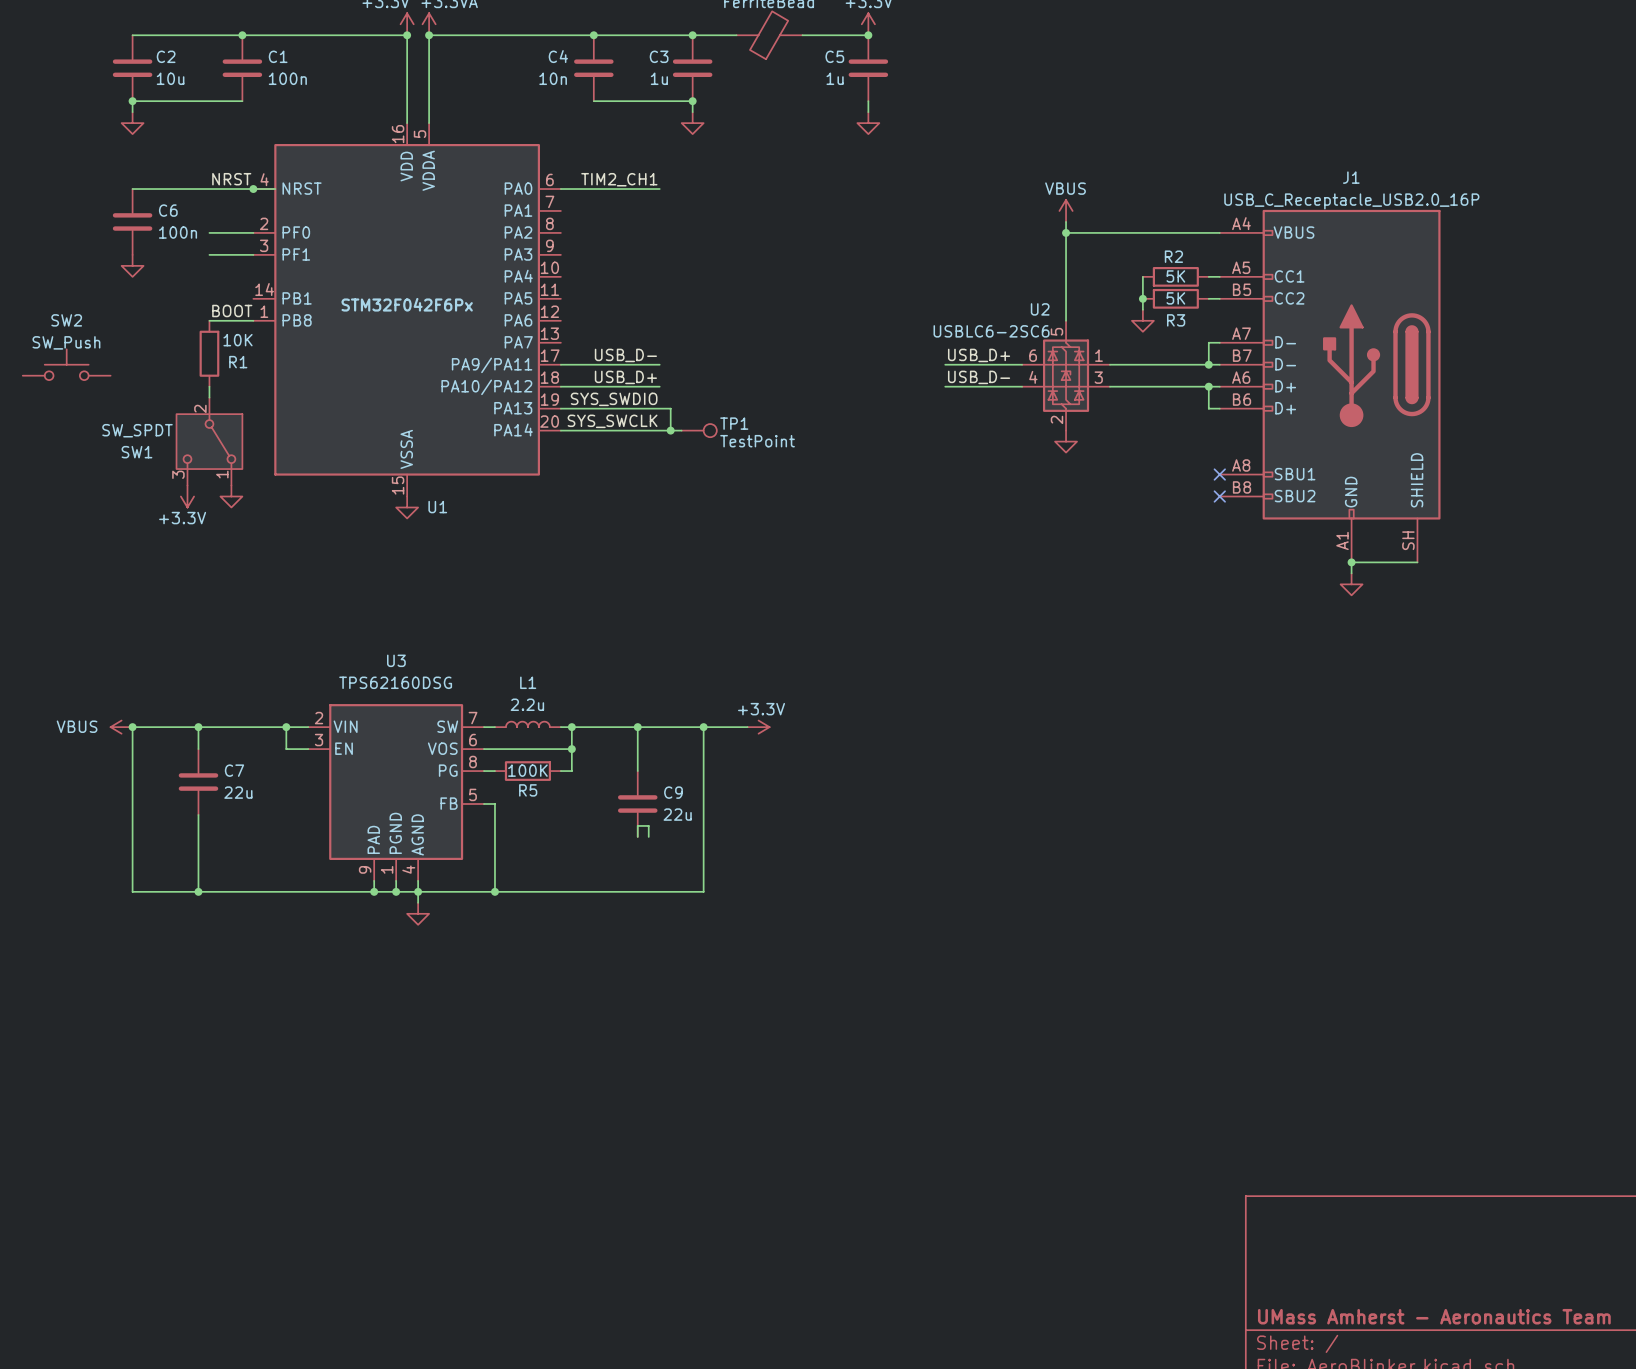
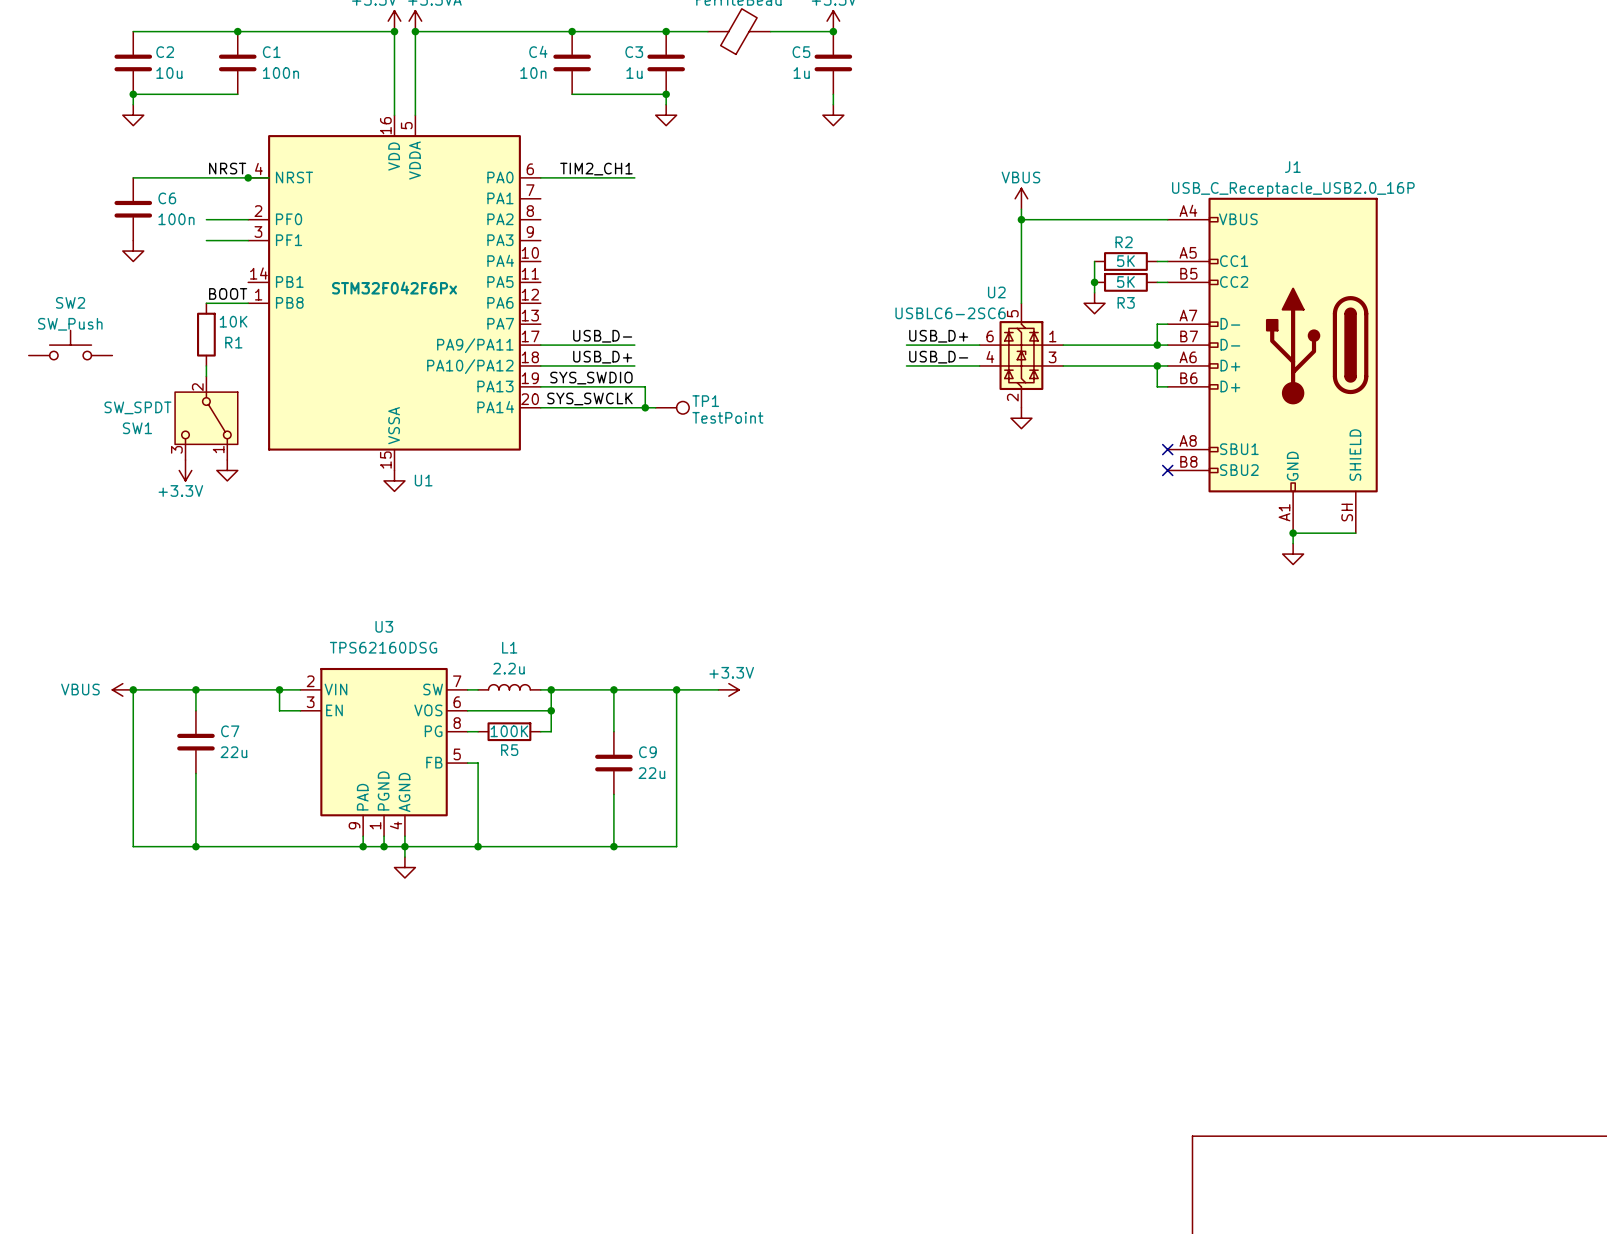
wire: (637, 836) (637, 825) (648, 825) (648, 836) -> (613, 794) (613, 846)
junction: none -> (613, 846)

